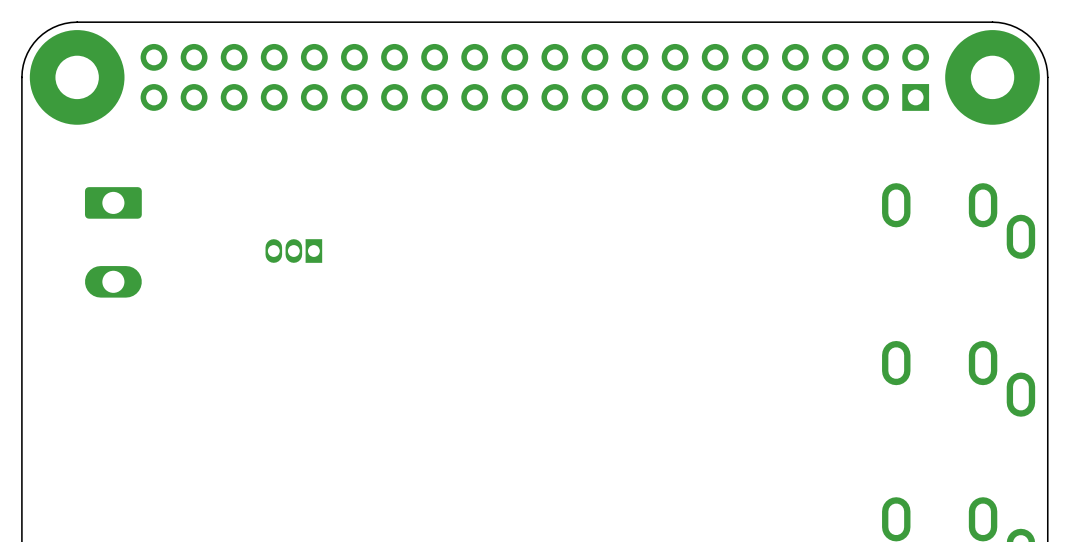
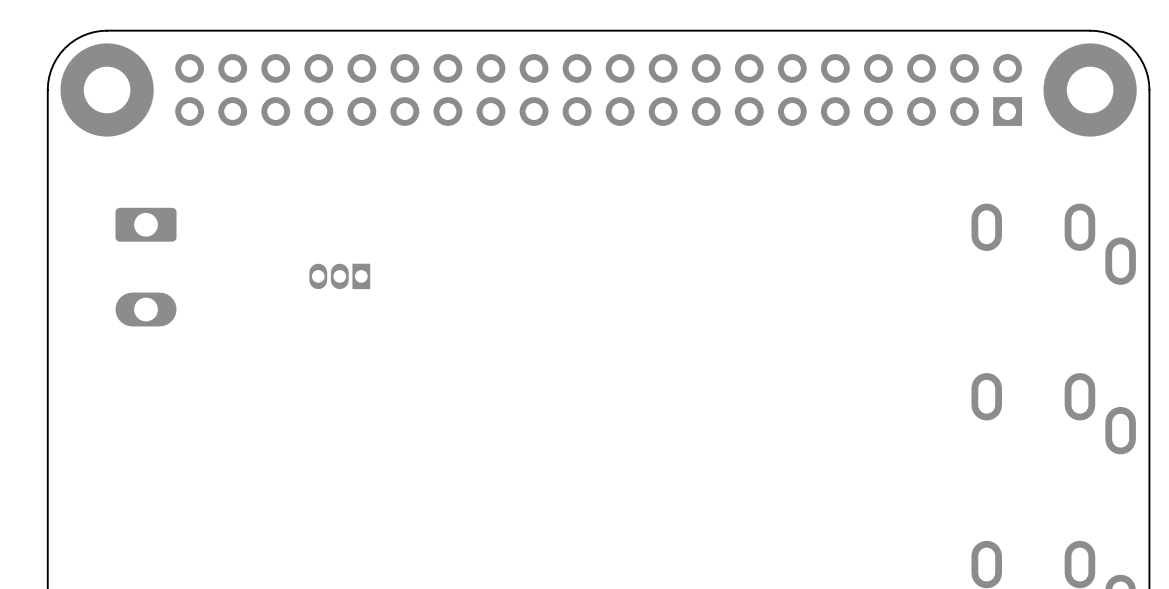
via: (77, 77) -> none
part: none -> (107, 89)
via: (992, 77) -> none
part: none -> (1090, 89)

